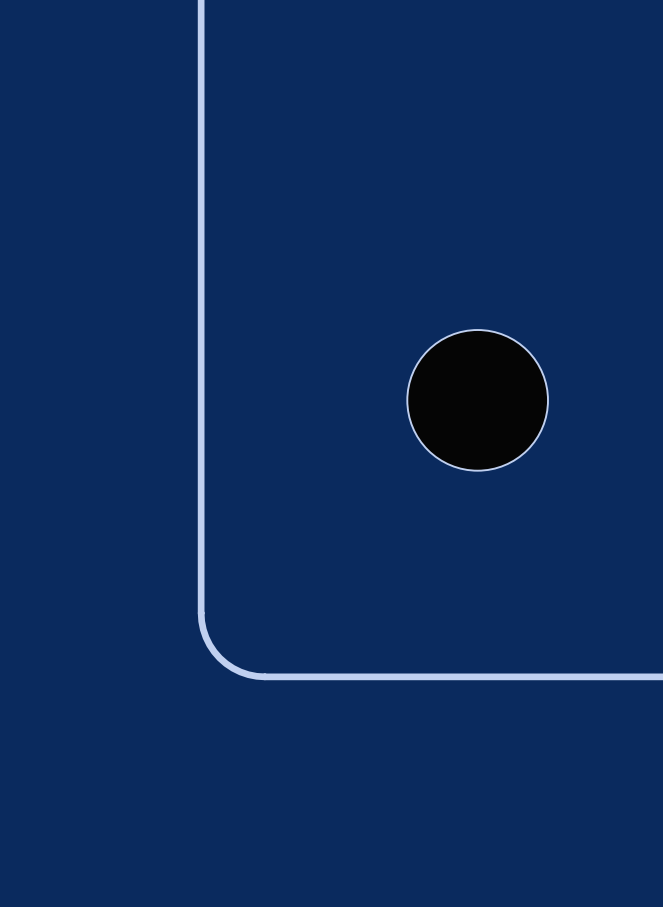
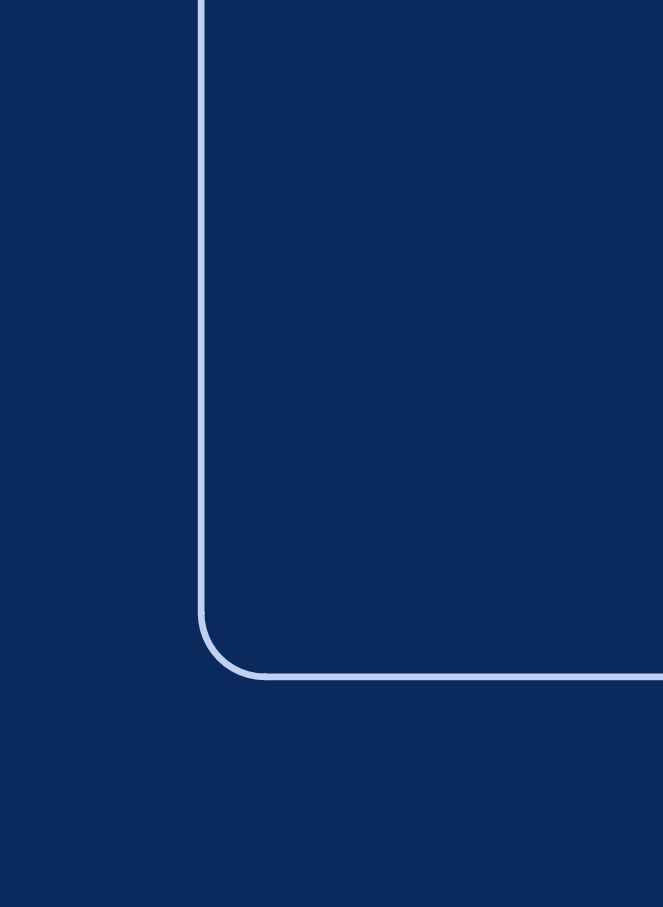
part: (477, 400) -> none

